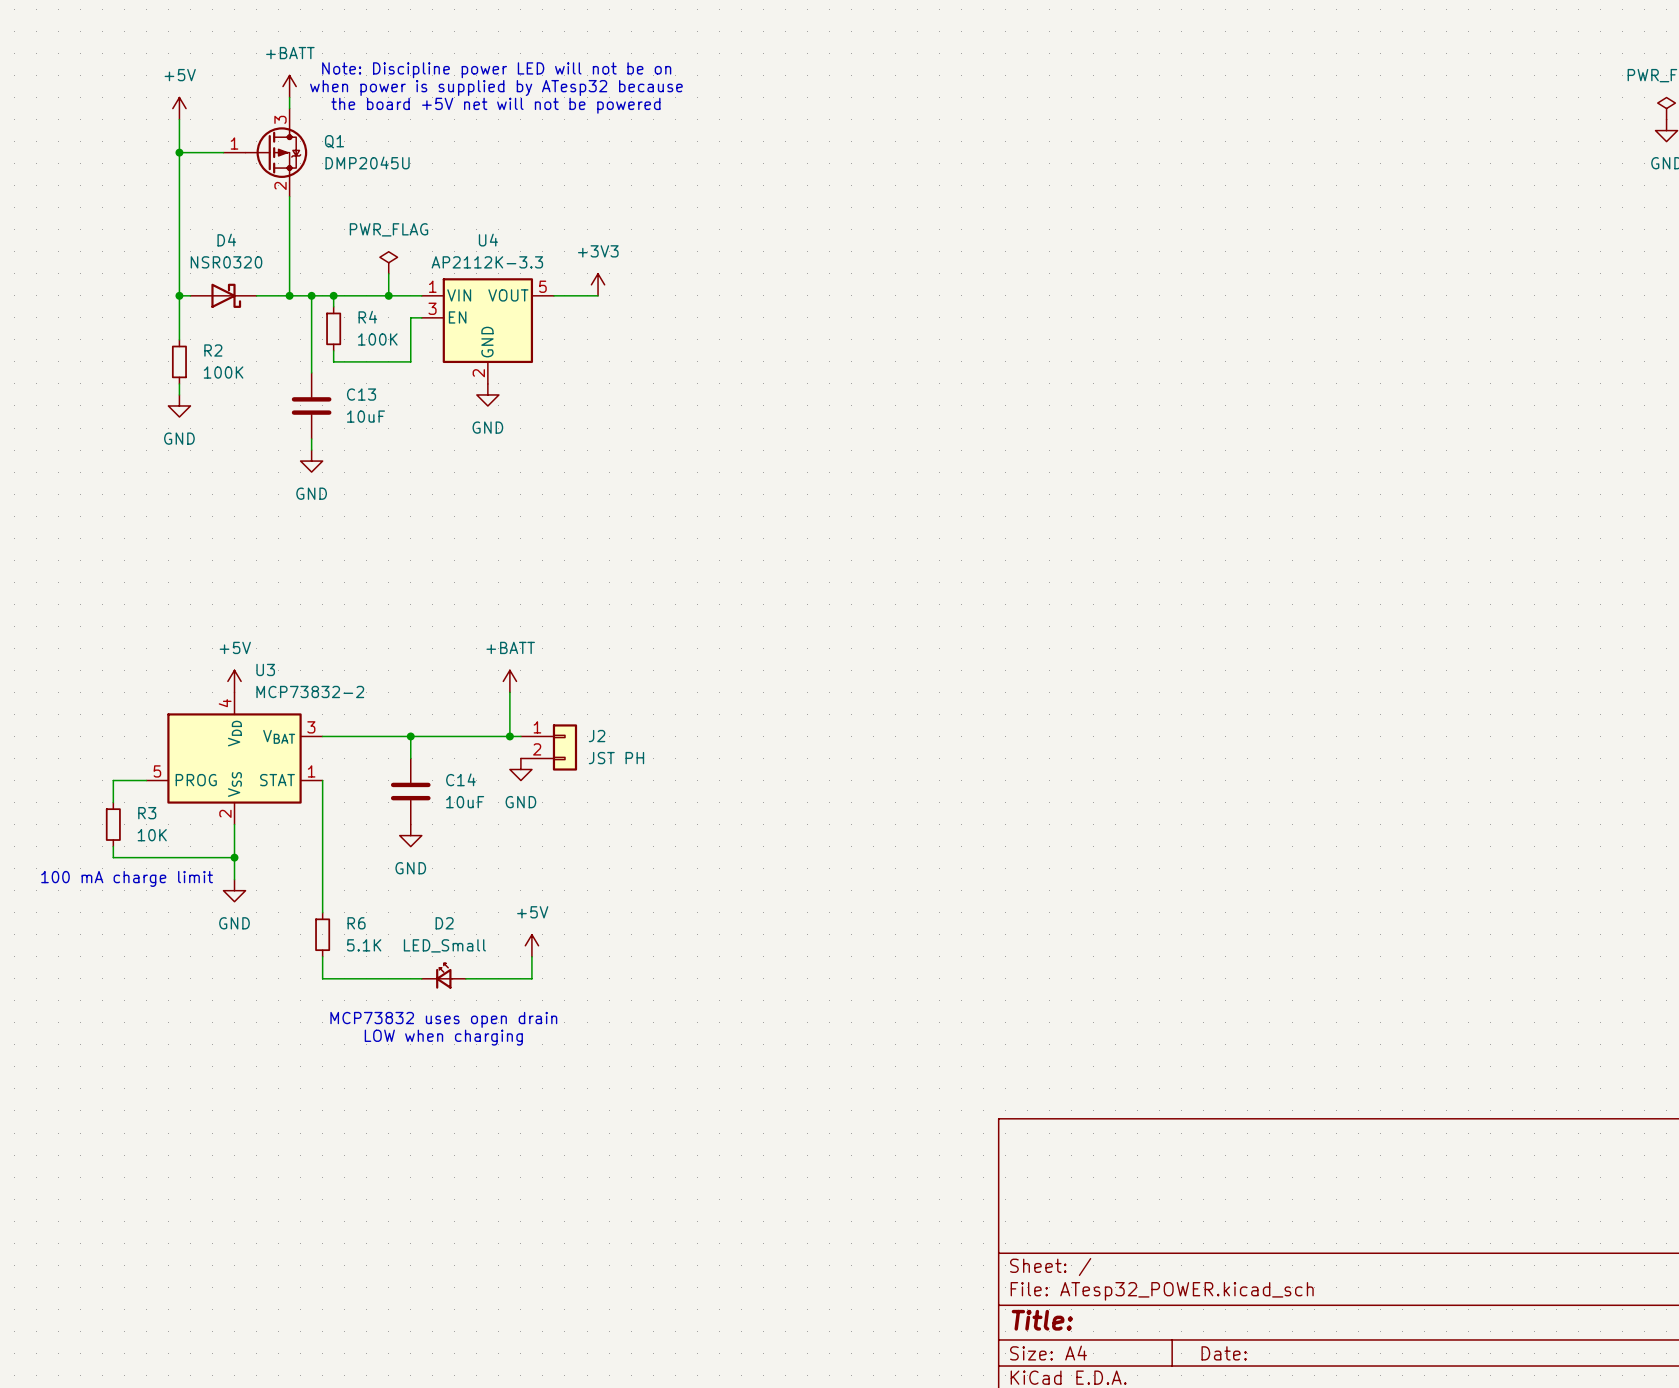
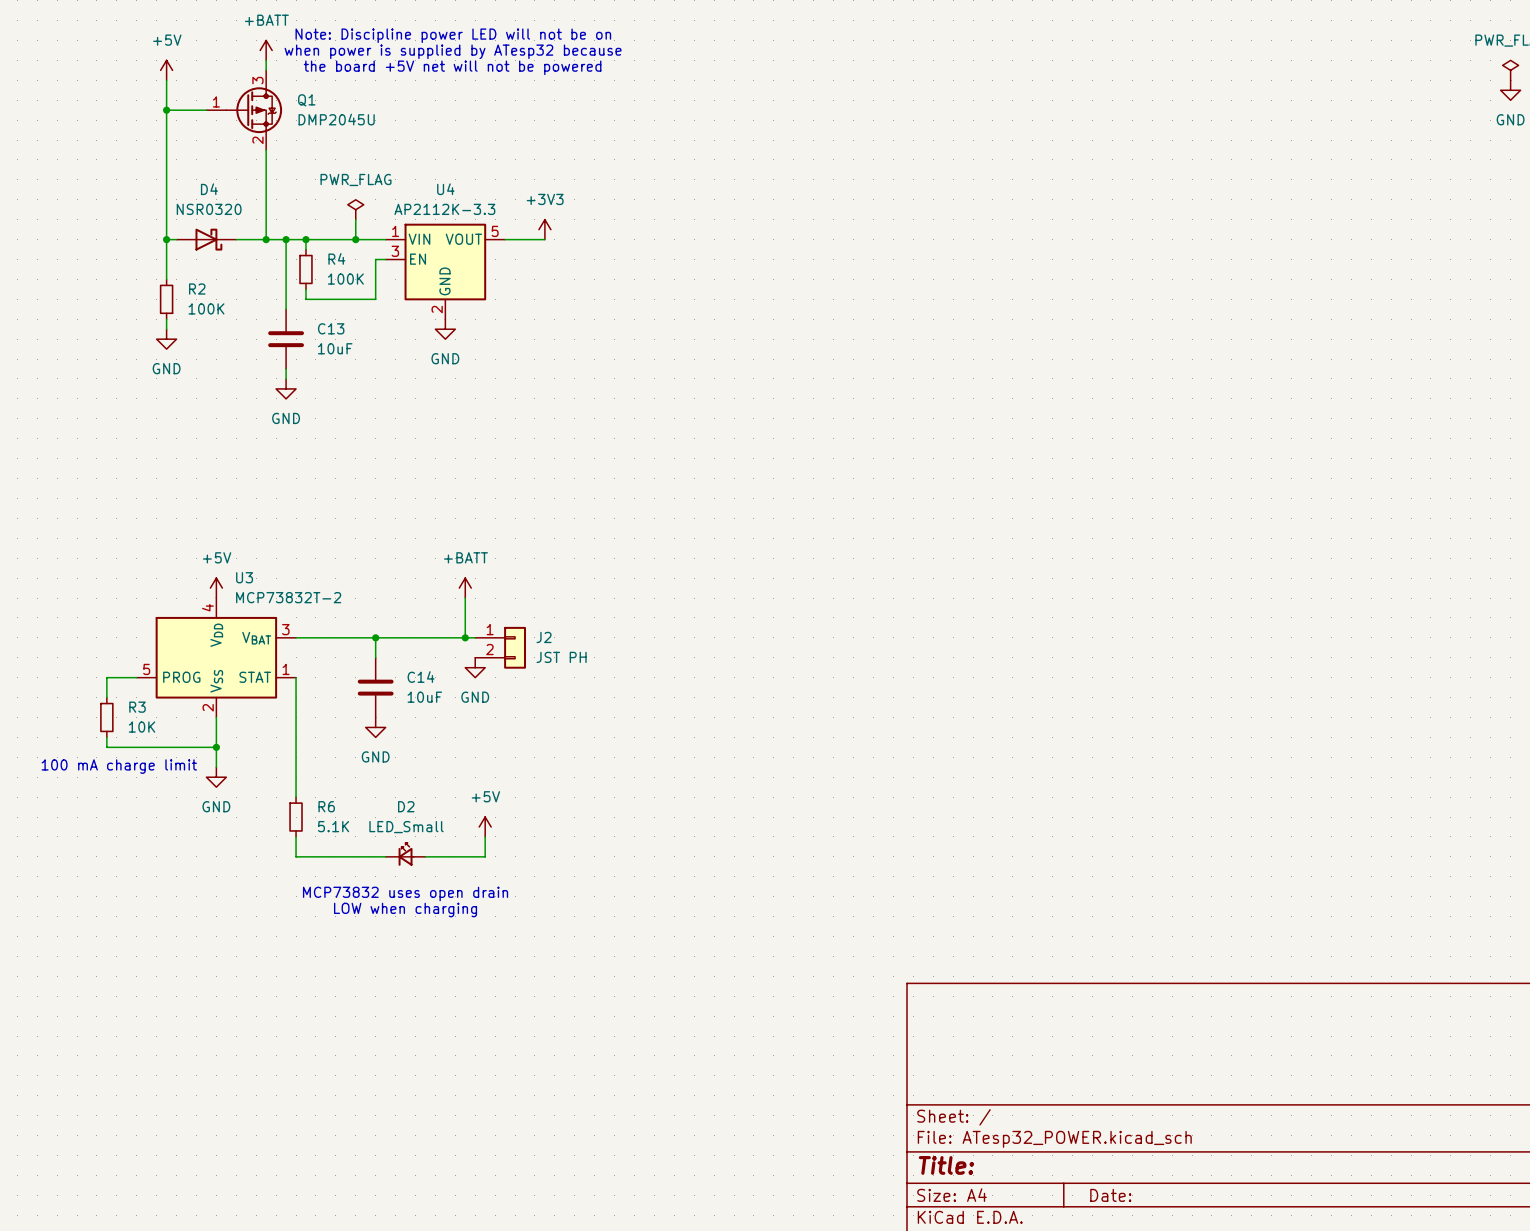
U3 value: MCP73832-2 (310, 691) -> MCP73832T-2 (288, 597)

